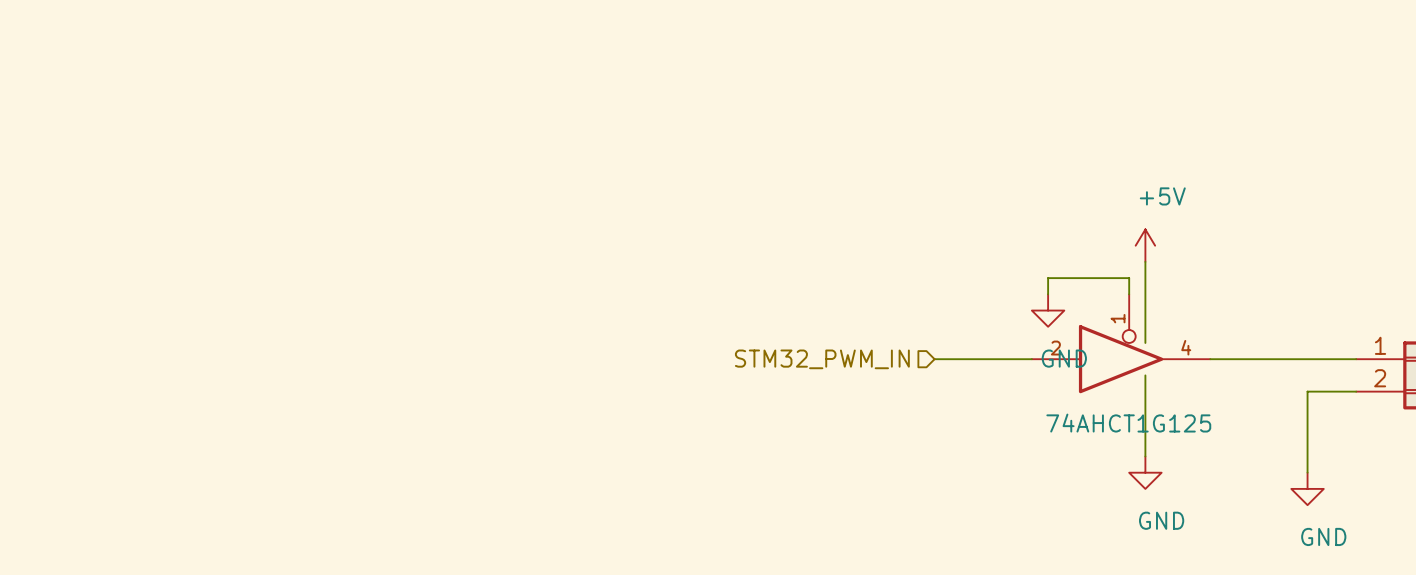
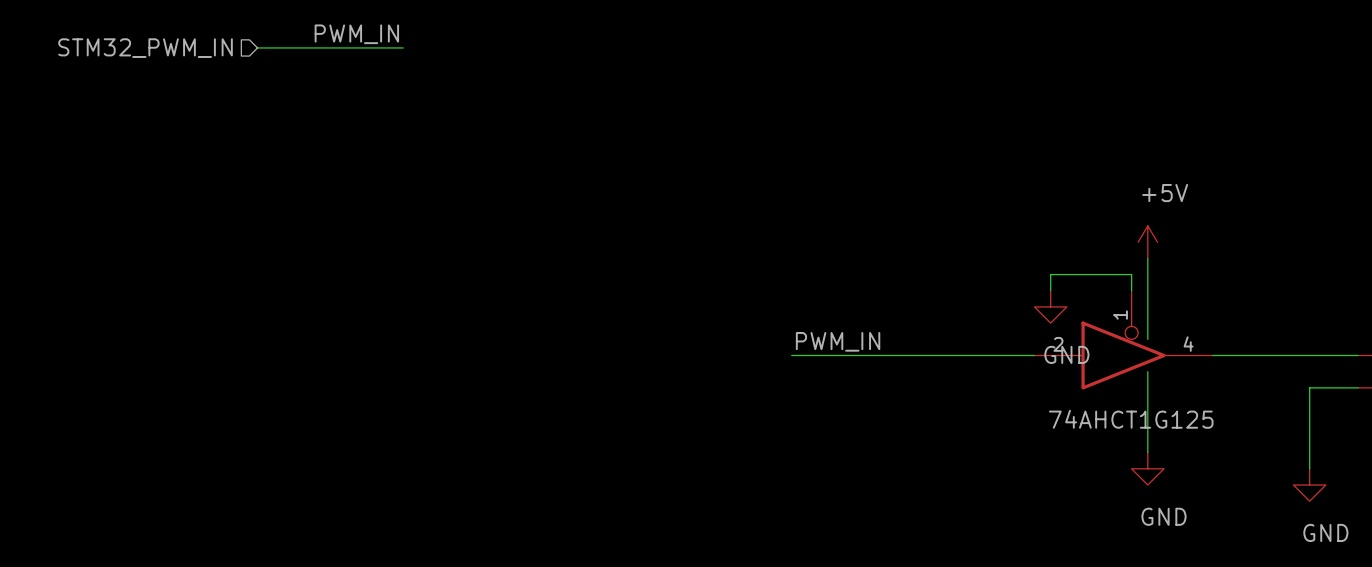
label: none -> PWM_IN (356, 34)
hierarchical label: none -> STM32_PWM_IN (145, 48)
wire: none -> (257, 47) (403, 47)
label: none -> PWM_IN (838, 341)
wire: none -> (791, 355) (937, 355)
hierarchical label: STM32_PWM_IN (822, 359) -> none

